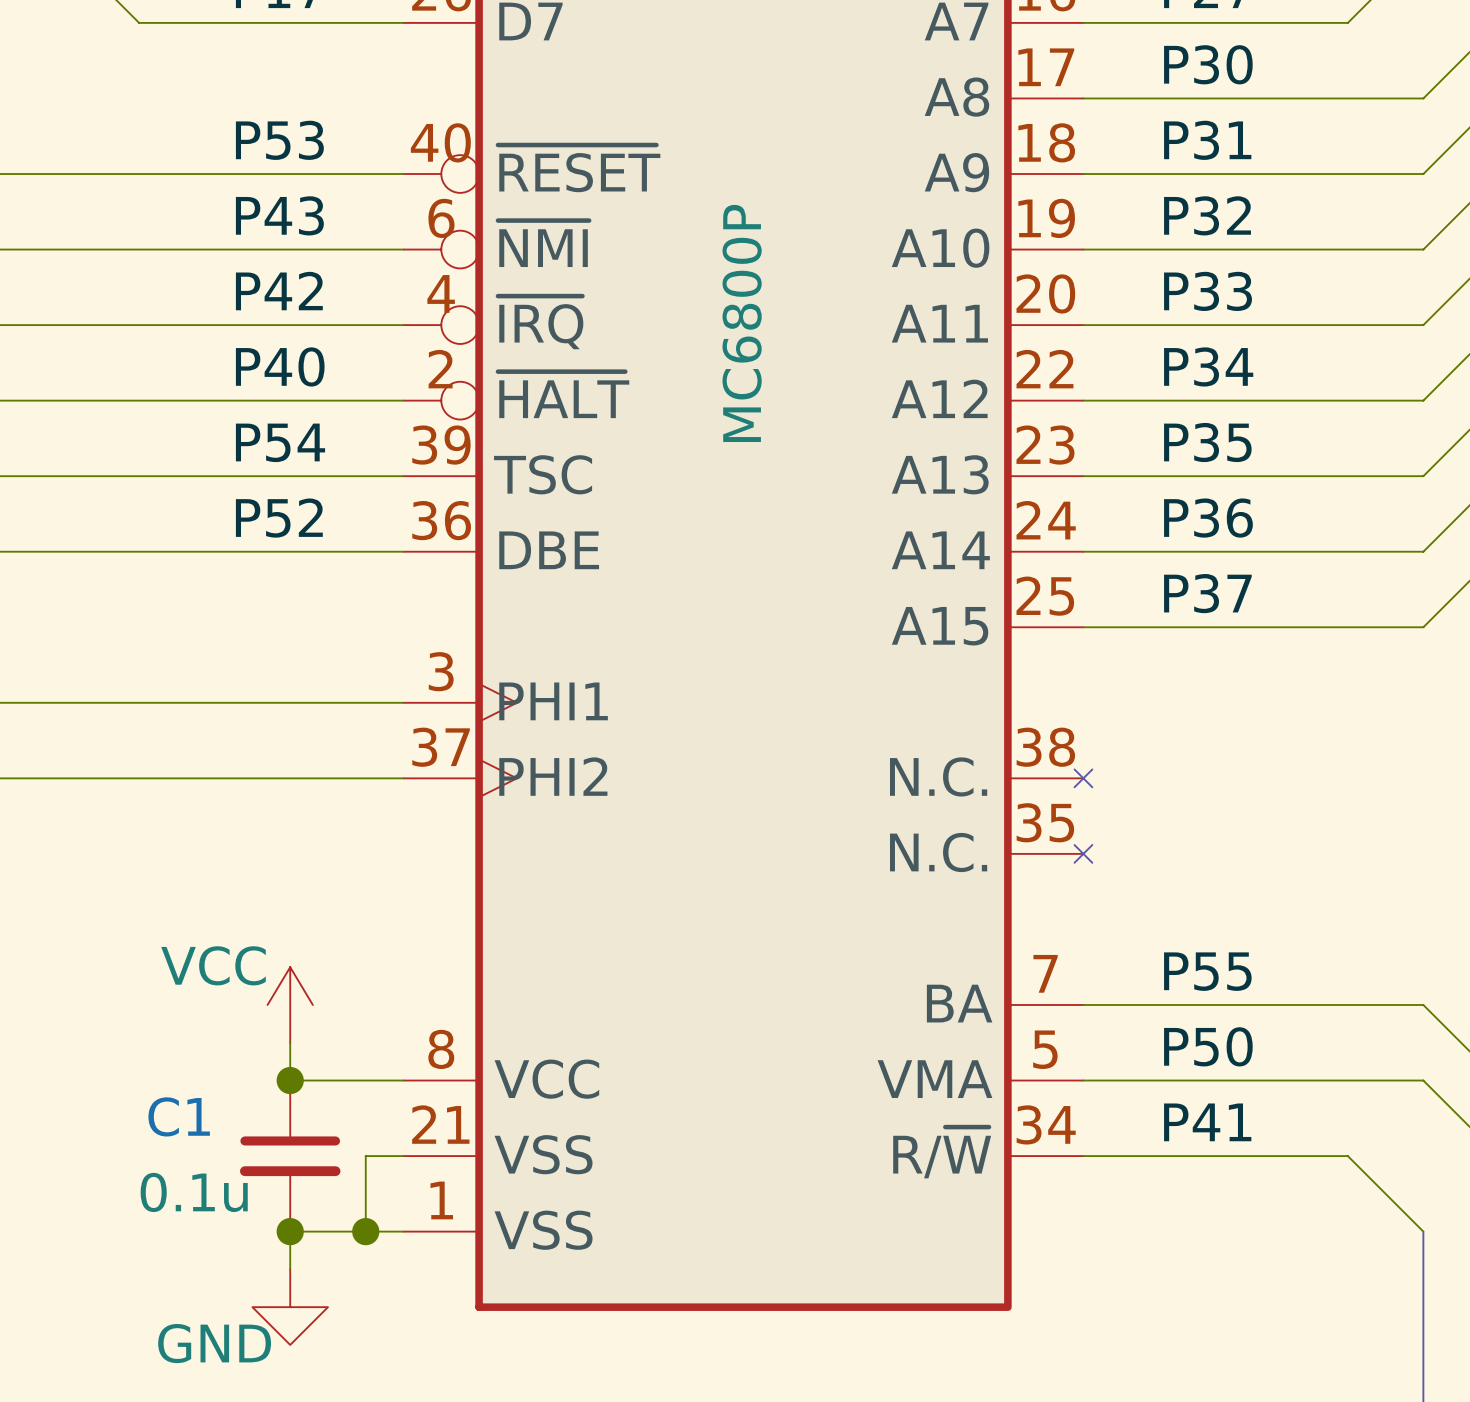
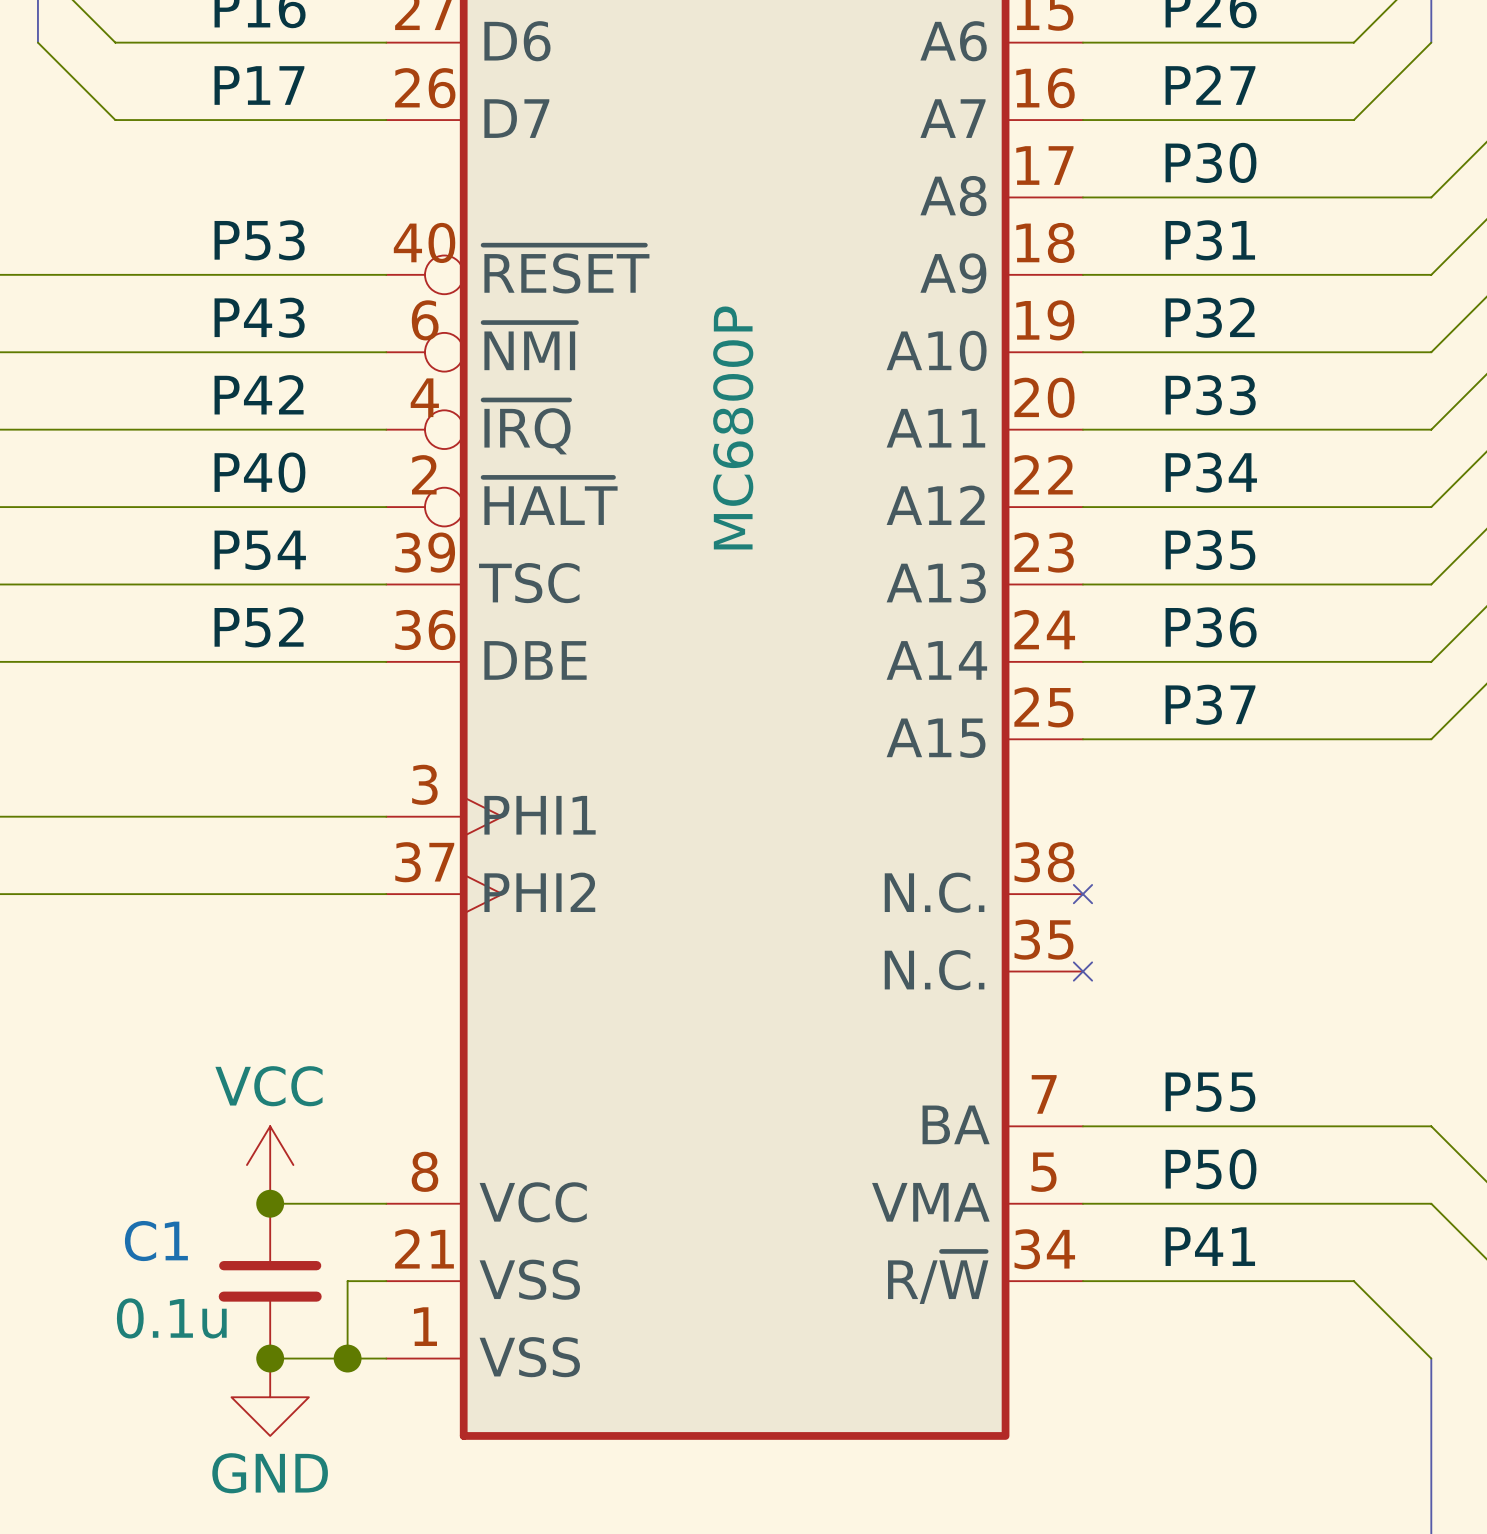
power symbol text position: VCC (213, 965) -> VCC (268, 1086)
power symbol position: VCC (290, 1004) -> VCC (270, 1165)
power symbol position: GND (290, 1307) -> GND (270, 1397)
power symbol text position: GND (214, 1343) -> GND (270, 1473)

